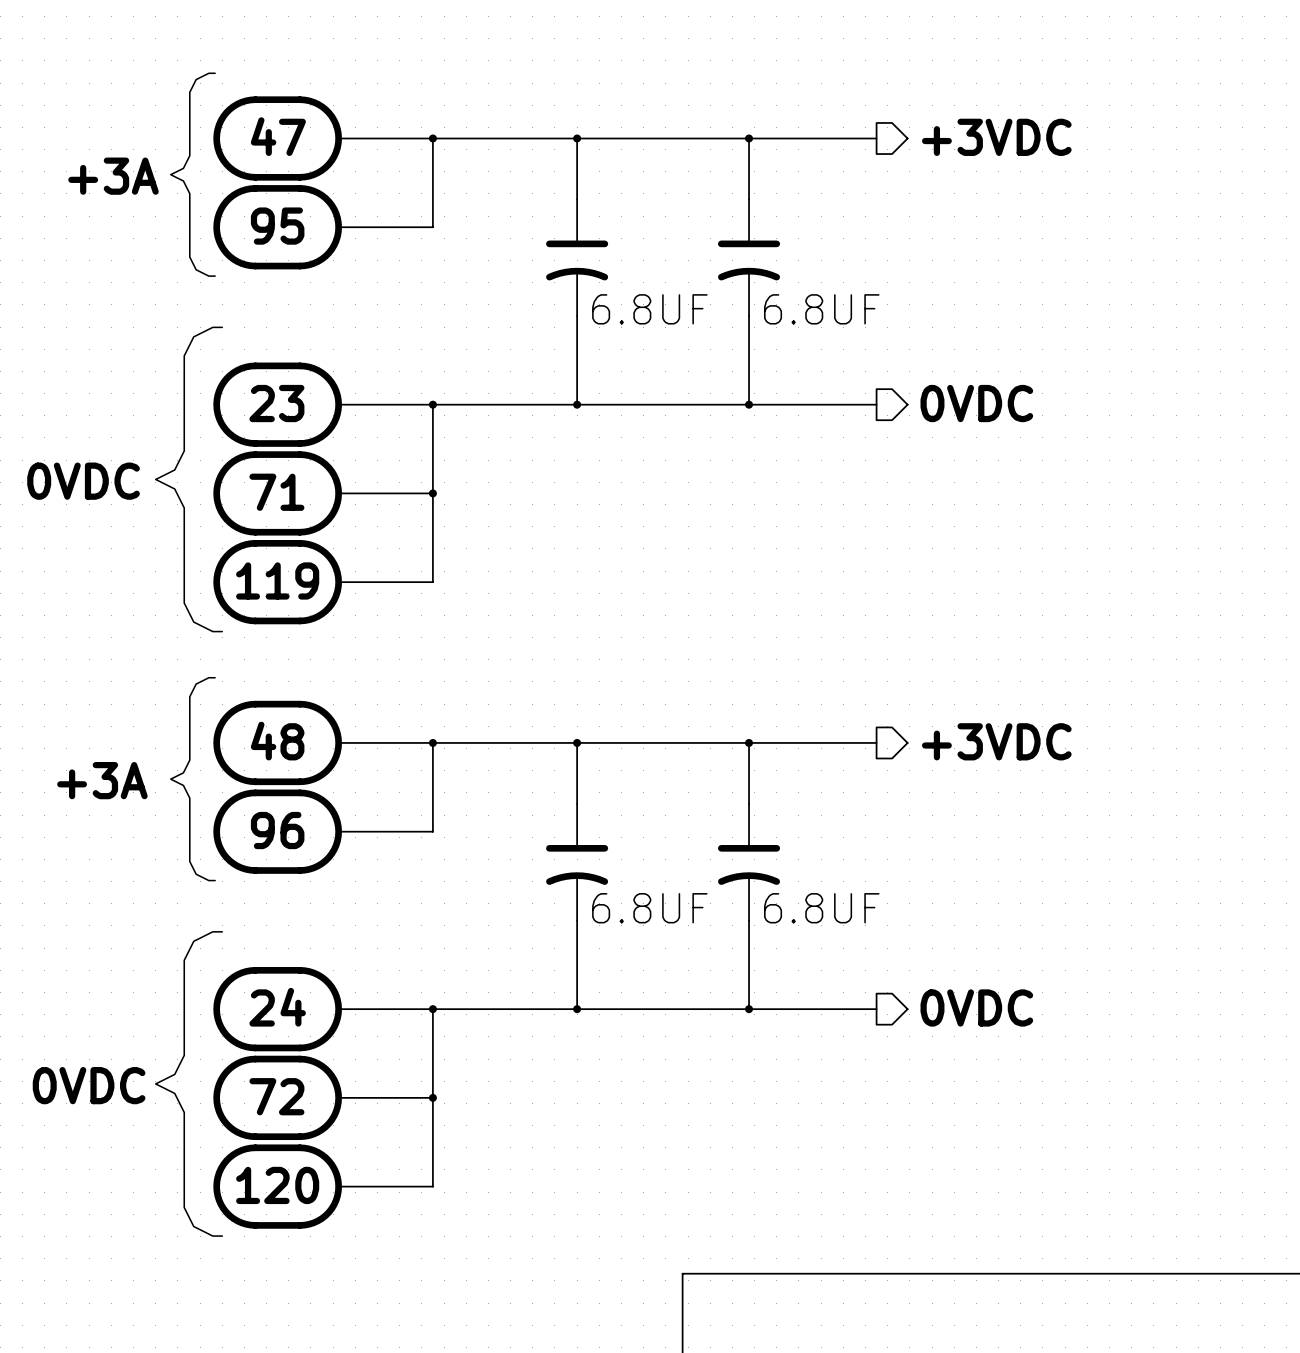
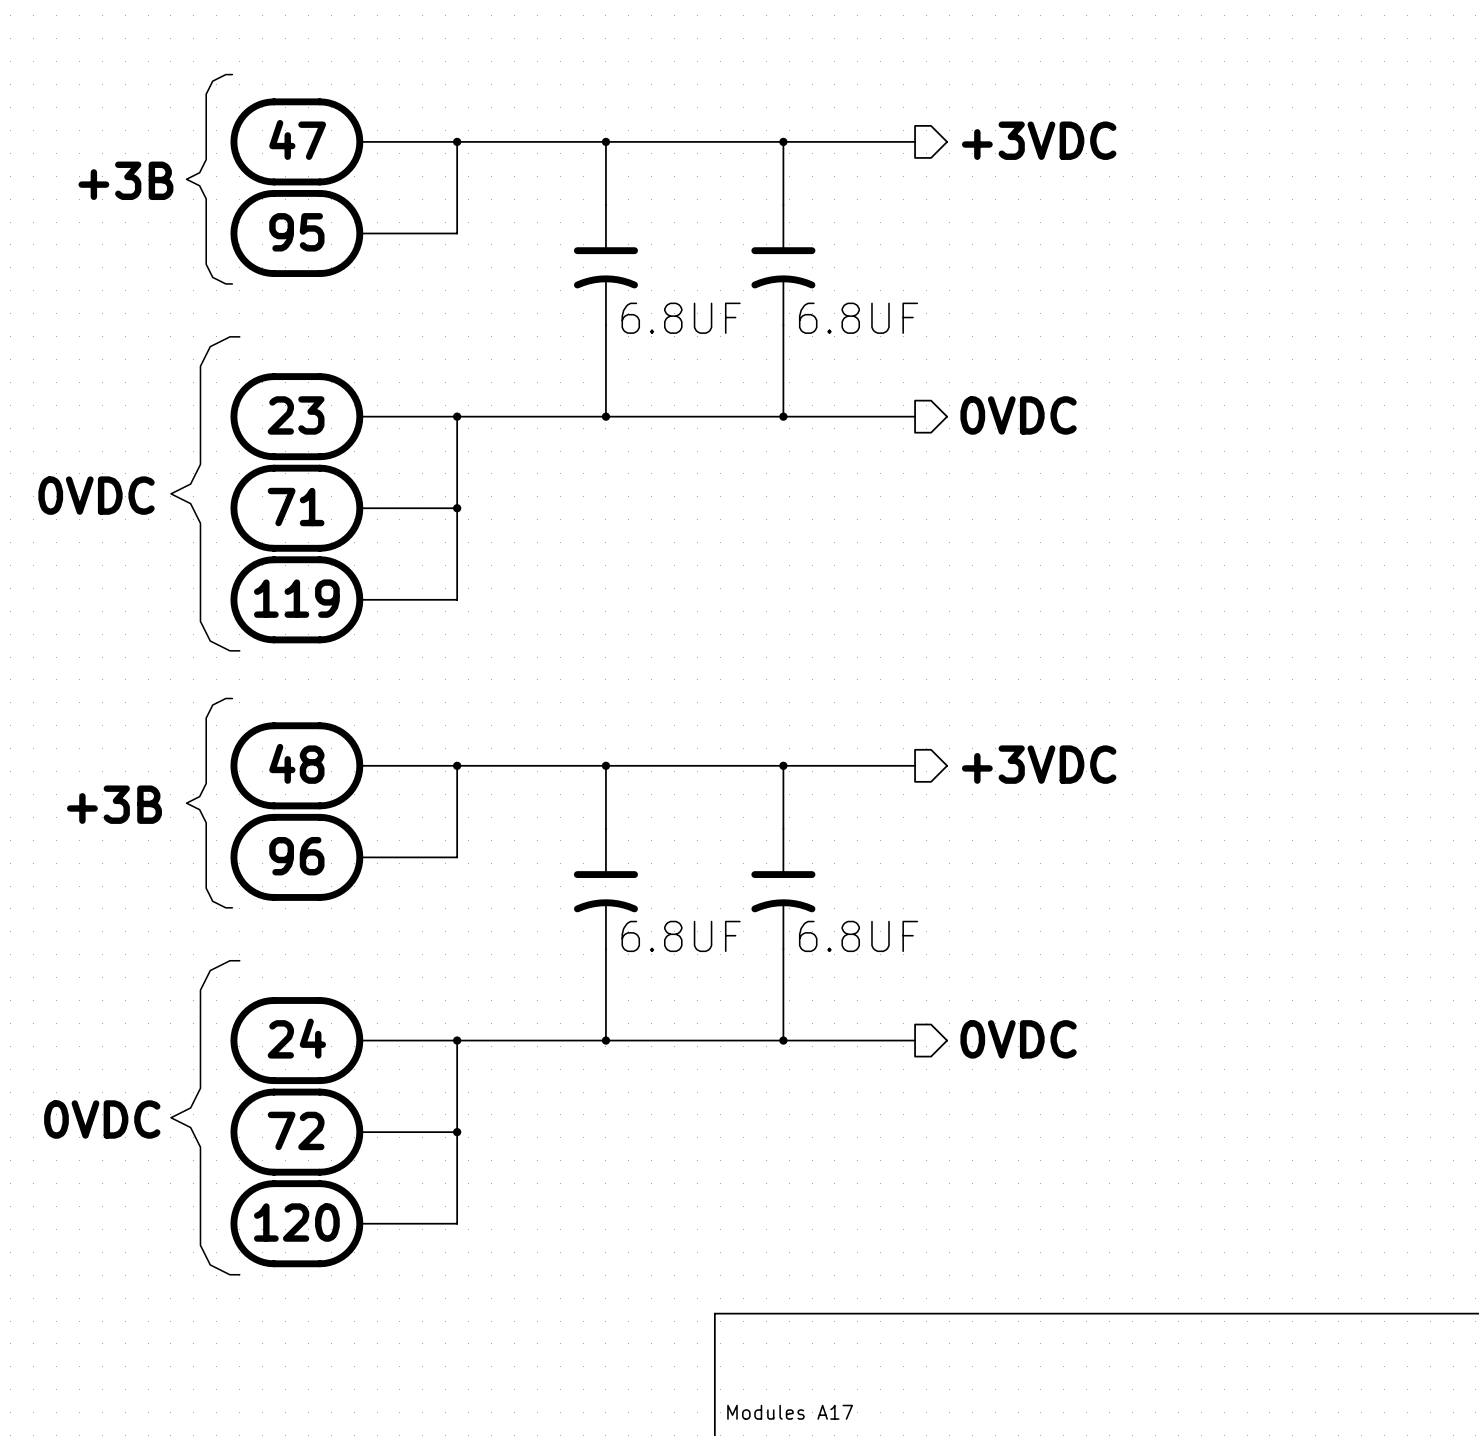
part text: +3A (113, 176) -> +3B (125, 180)
part text: +3A (102, 780) -> +3B (114, 804)

